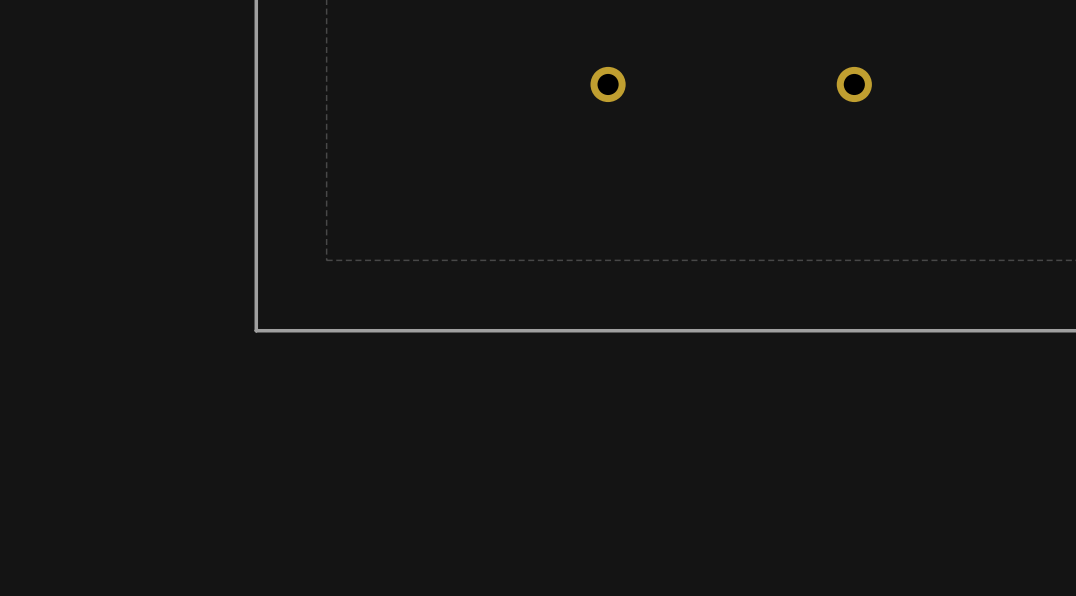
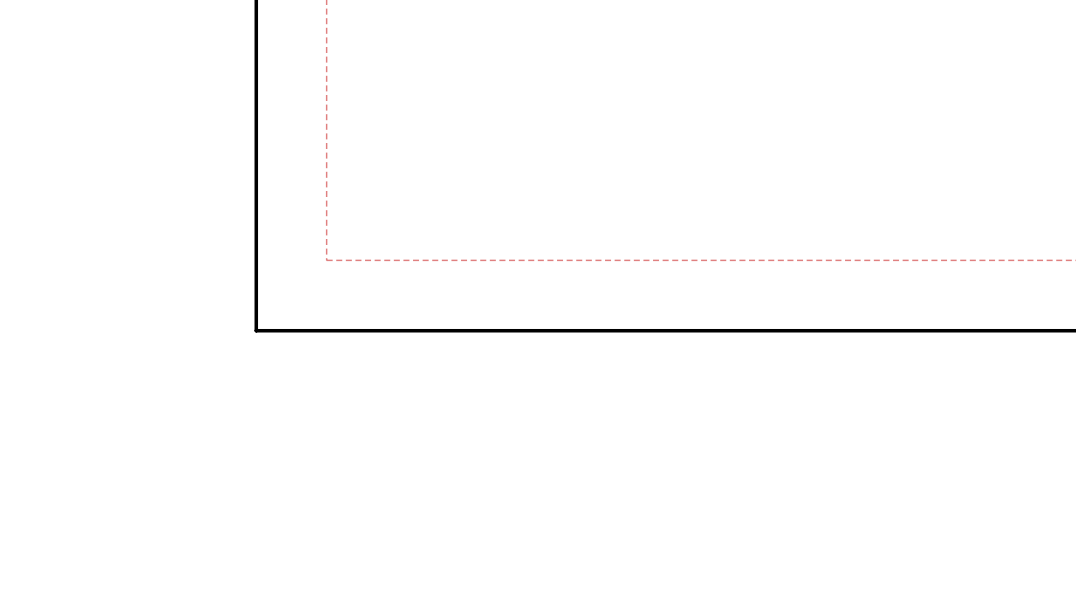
via: (608, 84) -> none
via: (854, 84) -> none

